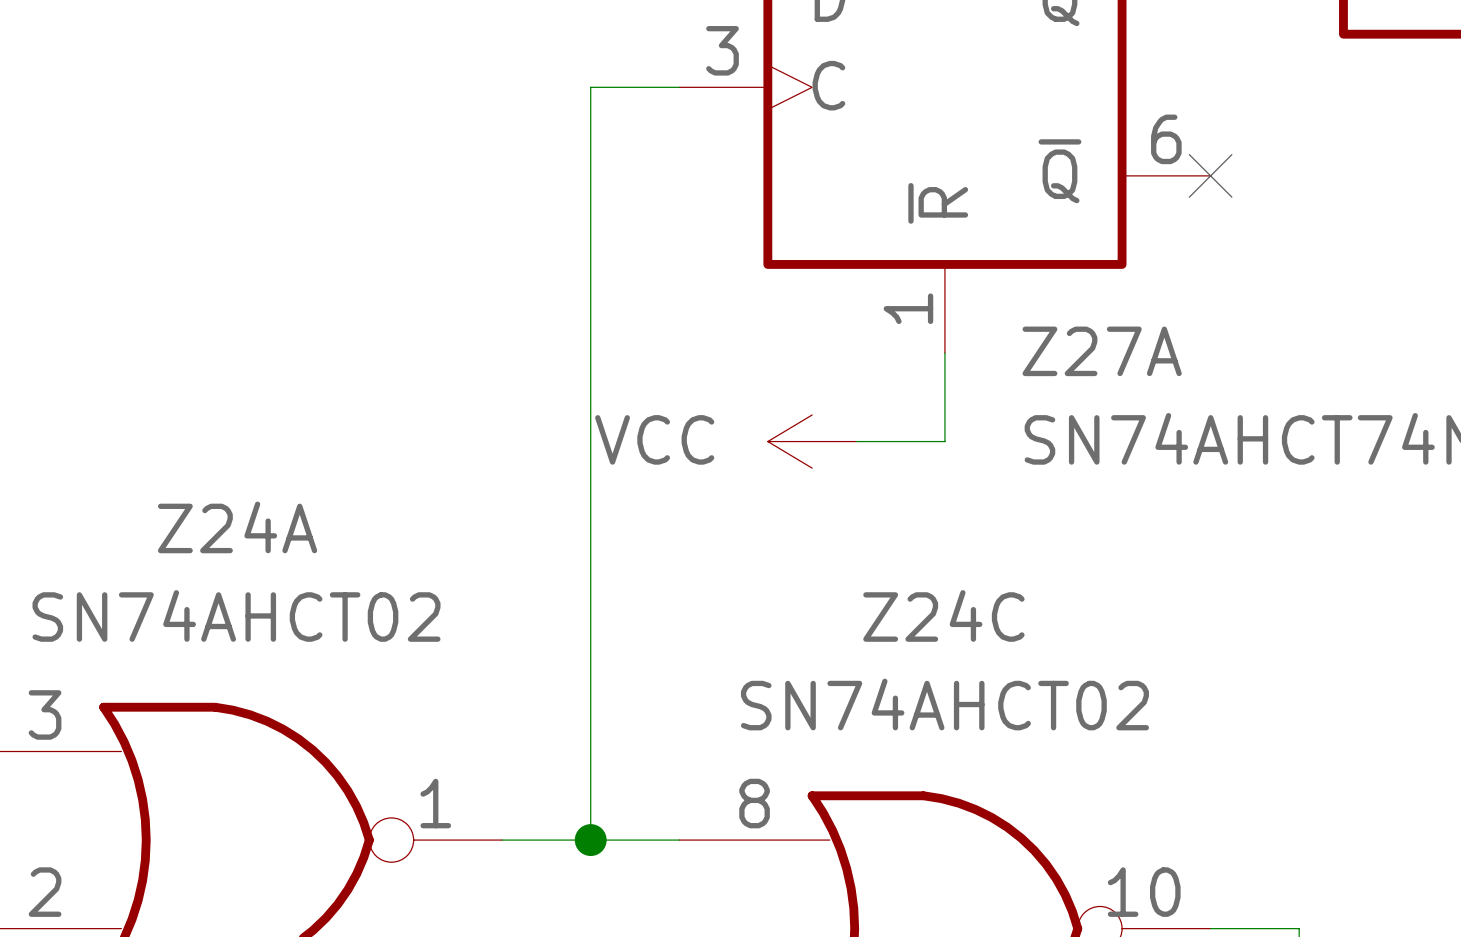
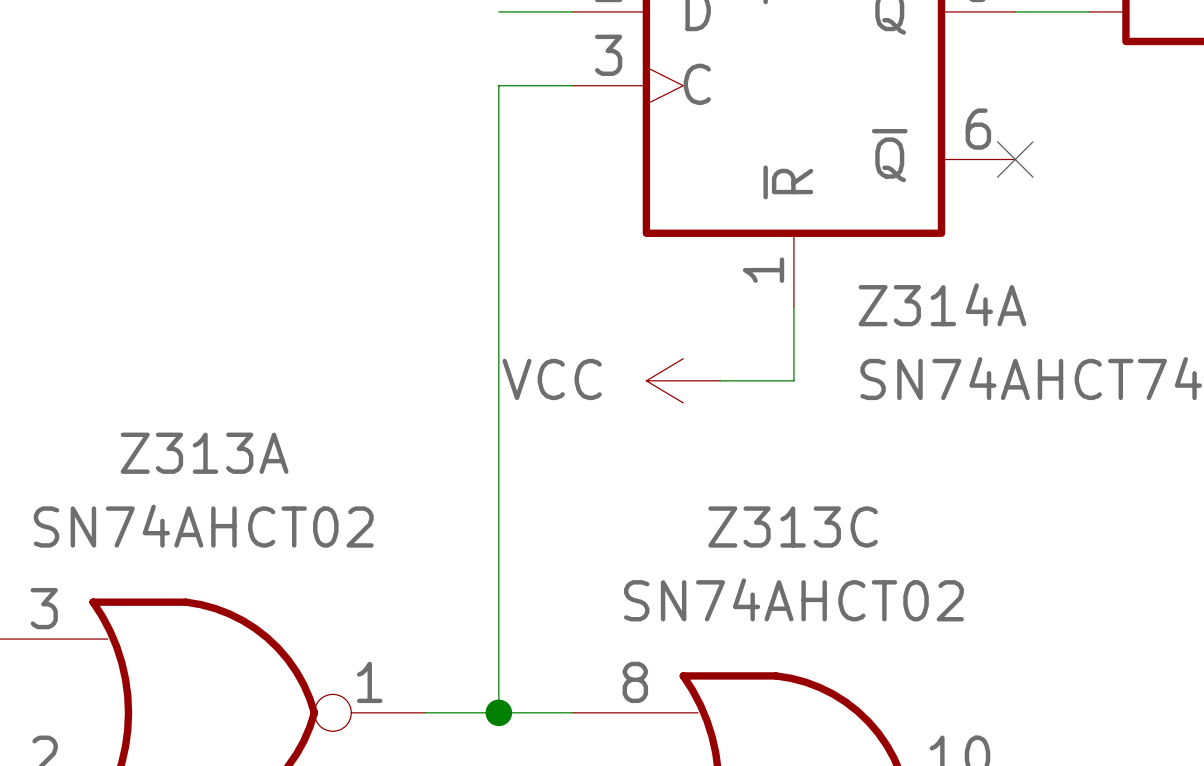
Z27A name: Z27A (1102, 351) -> Z314A (942, 304)
Z24A name: Z24A (237, 527) -> Z313A (204, 453)
Z24C name: Z24C (943, 615) -> Z313C (793, 527)

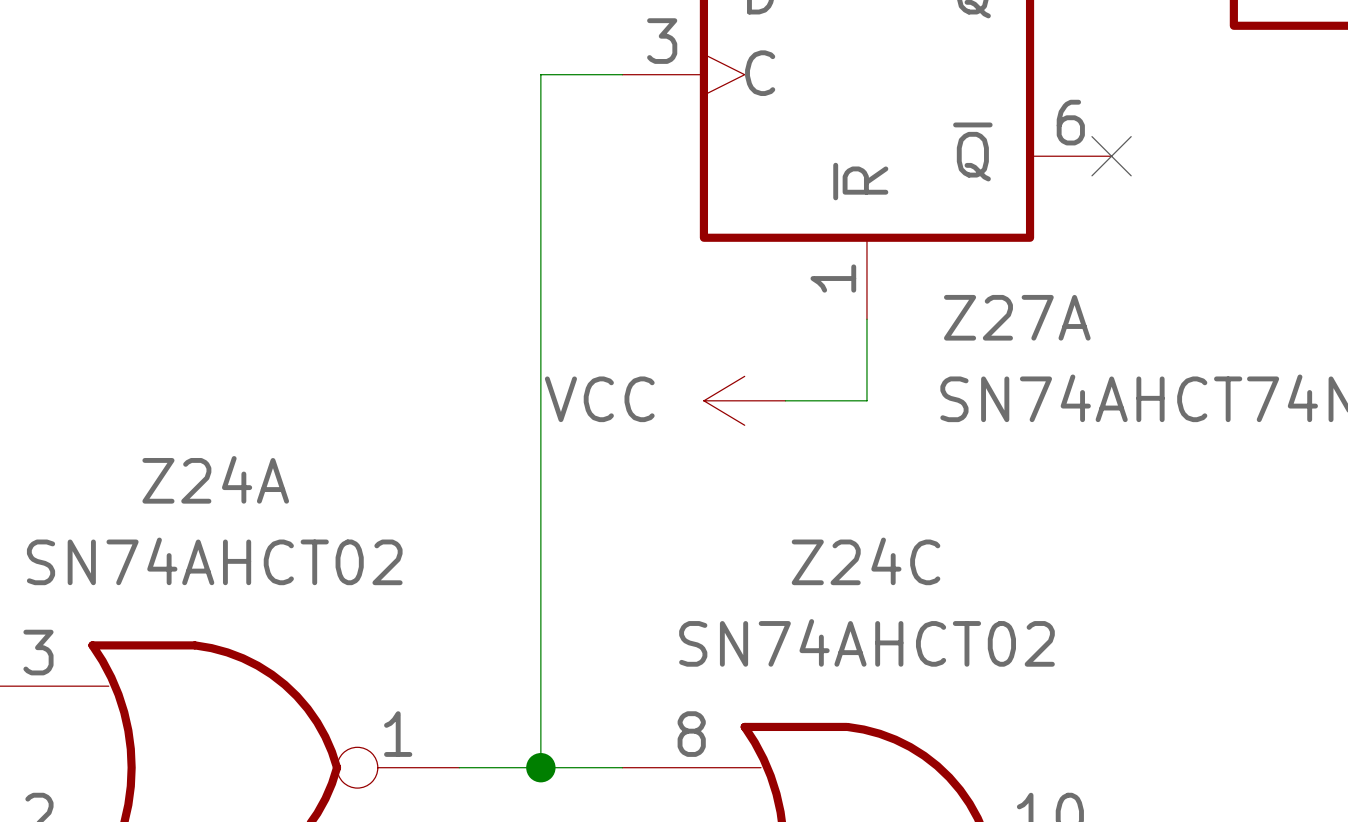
Z314A name: Z314A (942, 304) -> Z27A (1017, 317)
Z313A name: Z313A (204, 453) -> Z24A (215, 479)
Z313C name: Z313C (793, 527) -> Z24C (866, 561)

